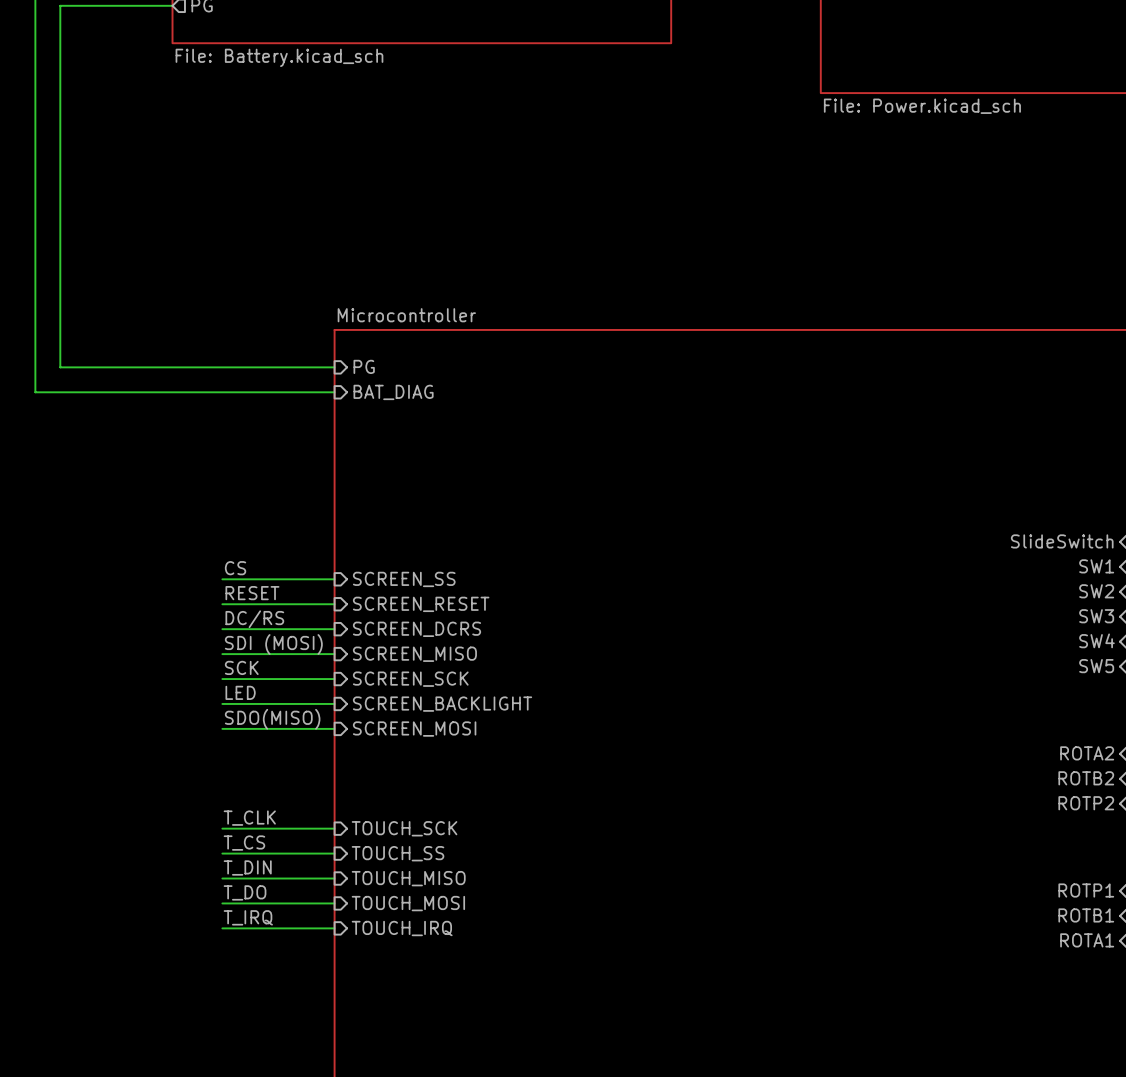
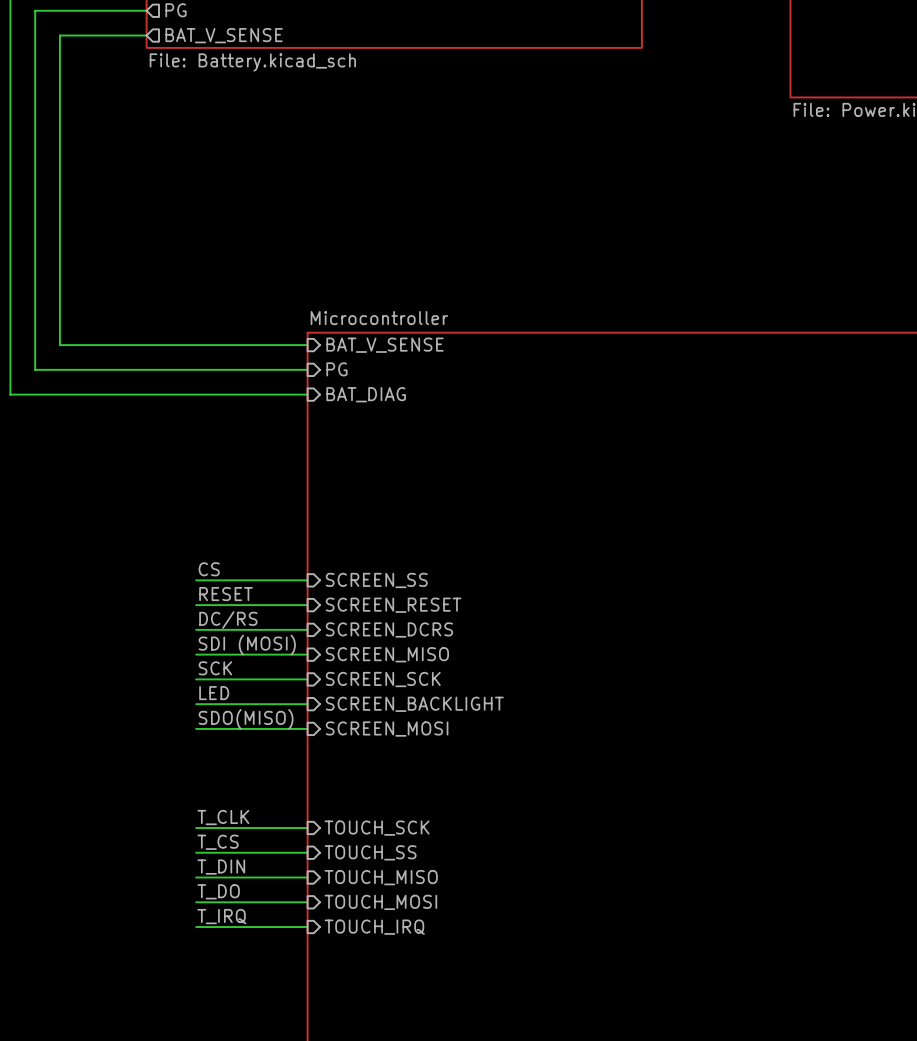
wire: none -> (146, 35) (59, 35) (59, 345) (307, 345)
sheet pin: none -> BAT_V_SENSE (224, 35)
sheet pin: none -> BAT_V_SENSE (385, 345)

